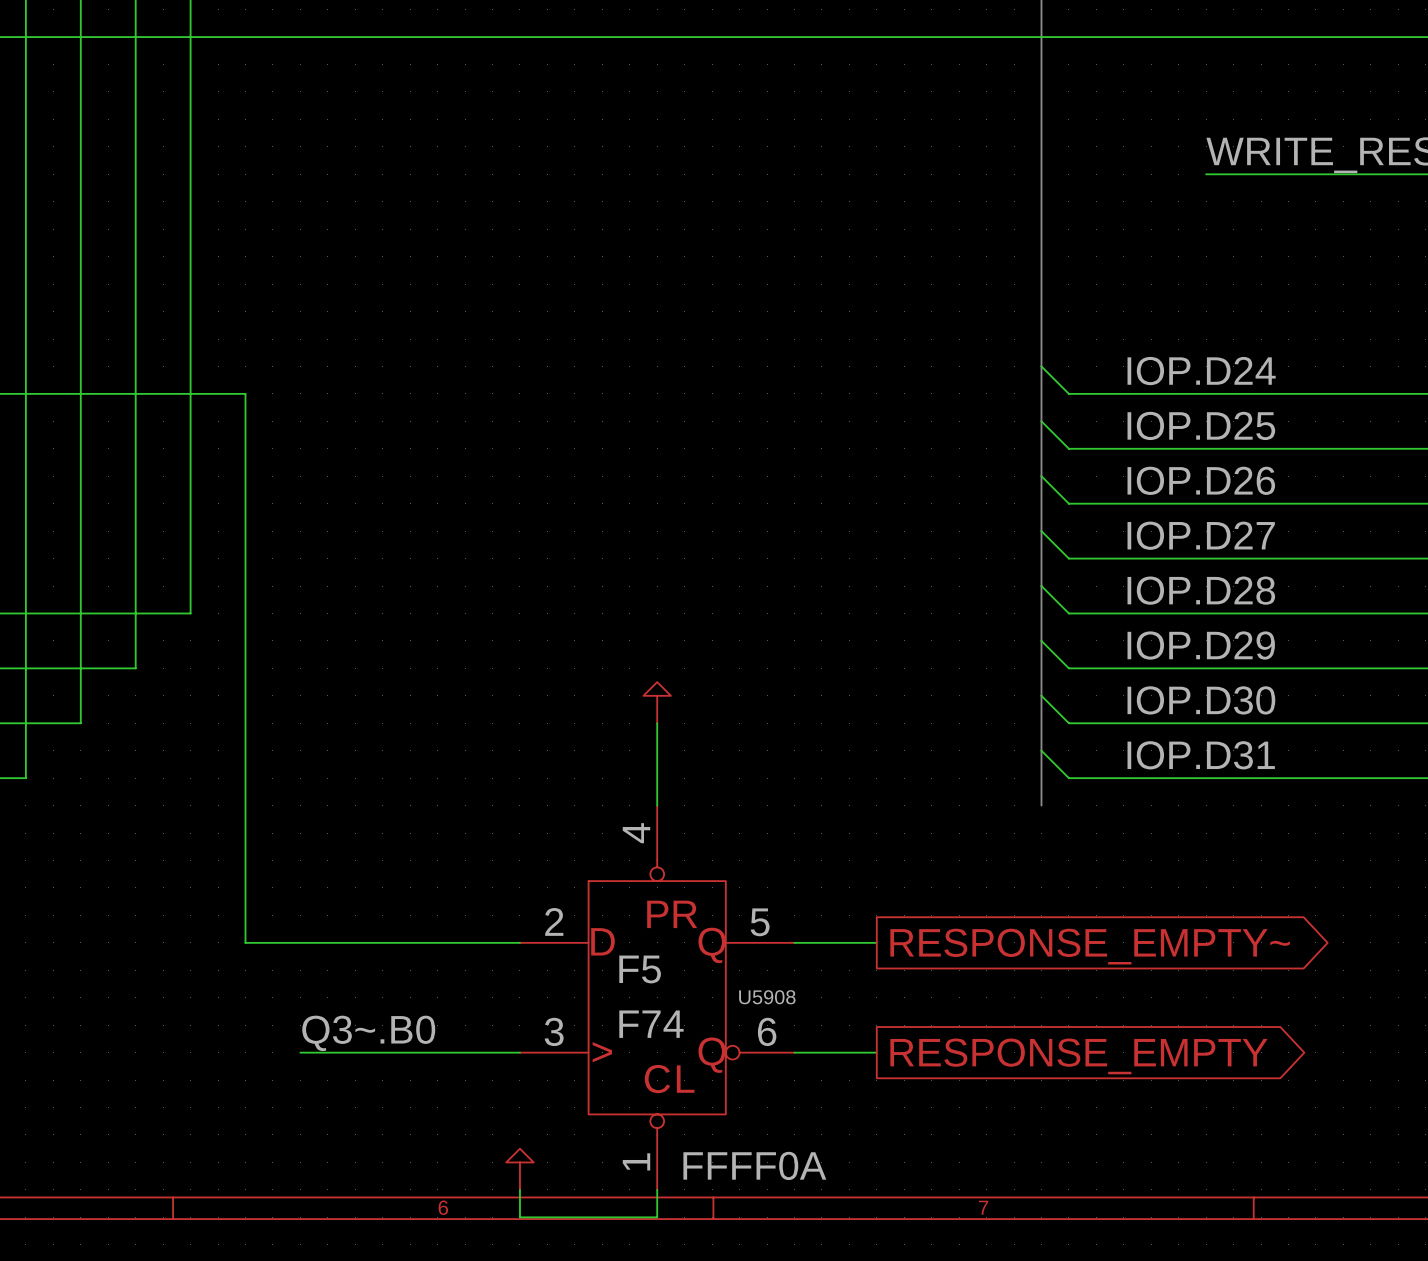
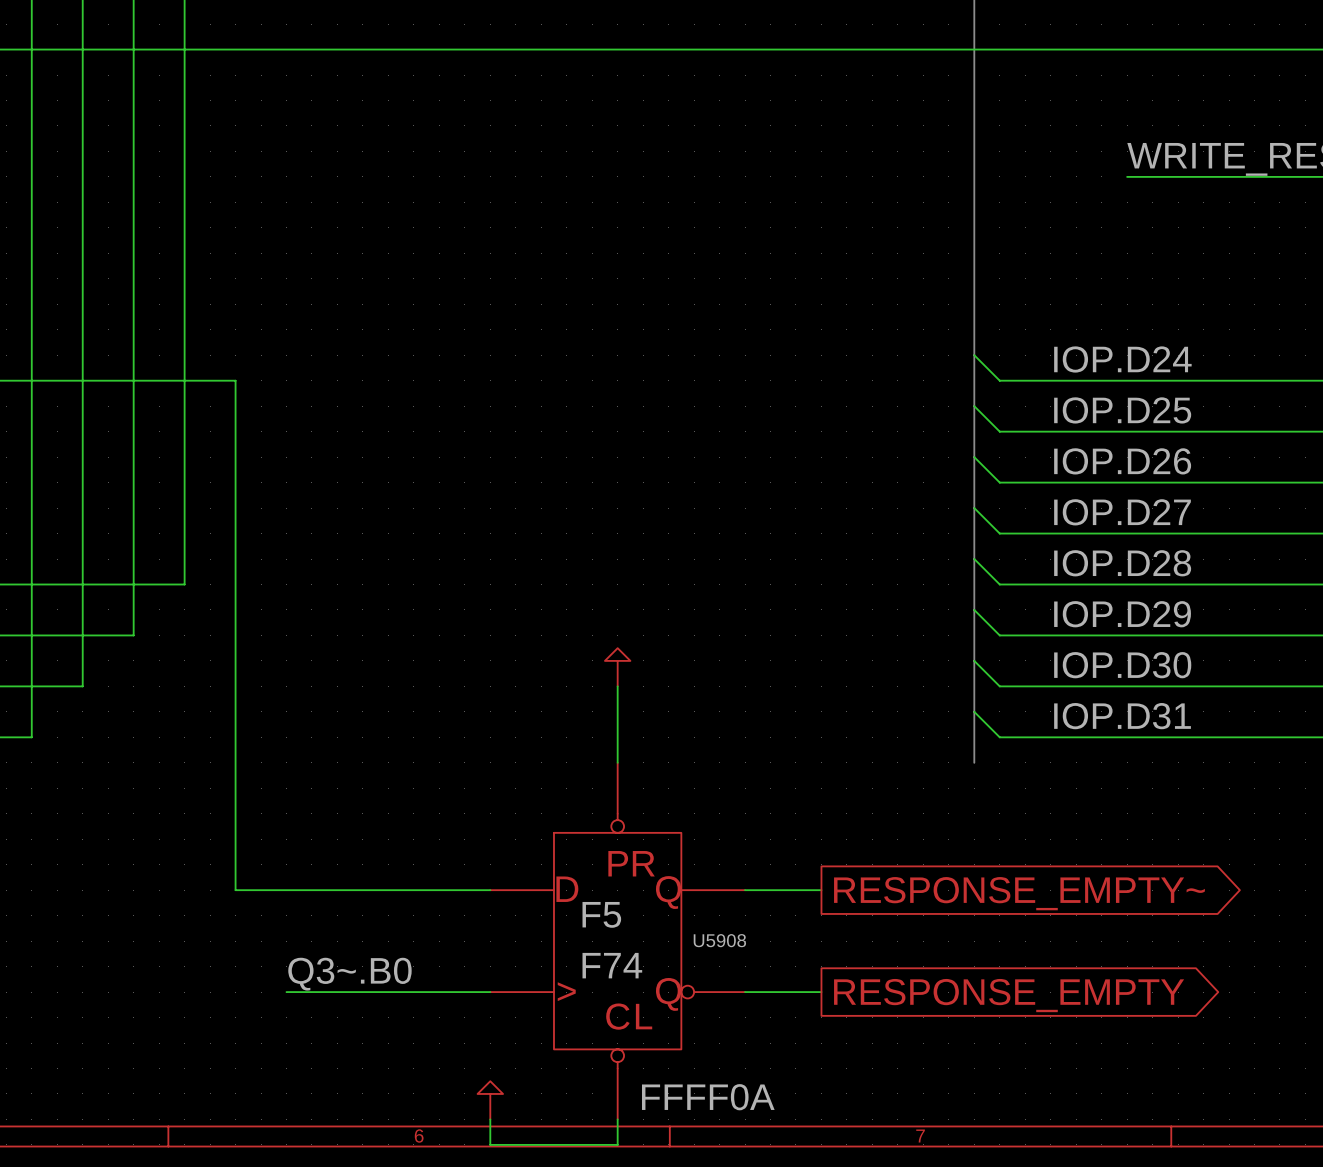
U5908 pin number: 4 (636, 833) -> none
U5908 pin number: 2 (554, 921) -> none
U5908 pin number: 5 (760, 922) -> none
U5908 pin number: 3 (554, 1031) -> none
U5908 pin number: 6 (767, 1031) -> none
U5908 pin number: 1 (636, 1161) -> none

